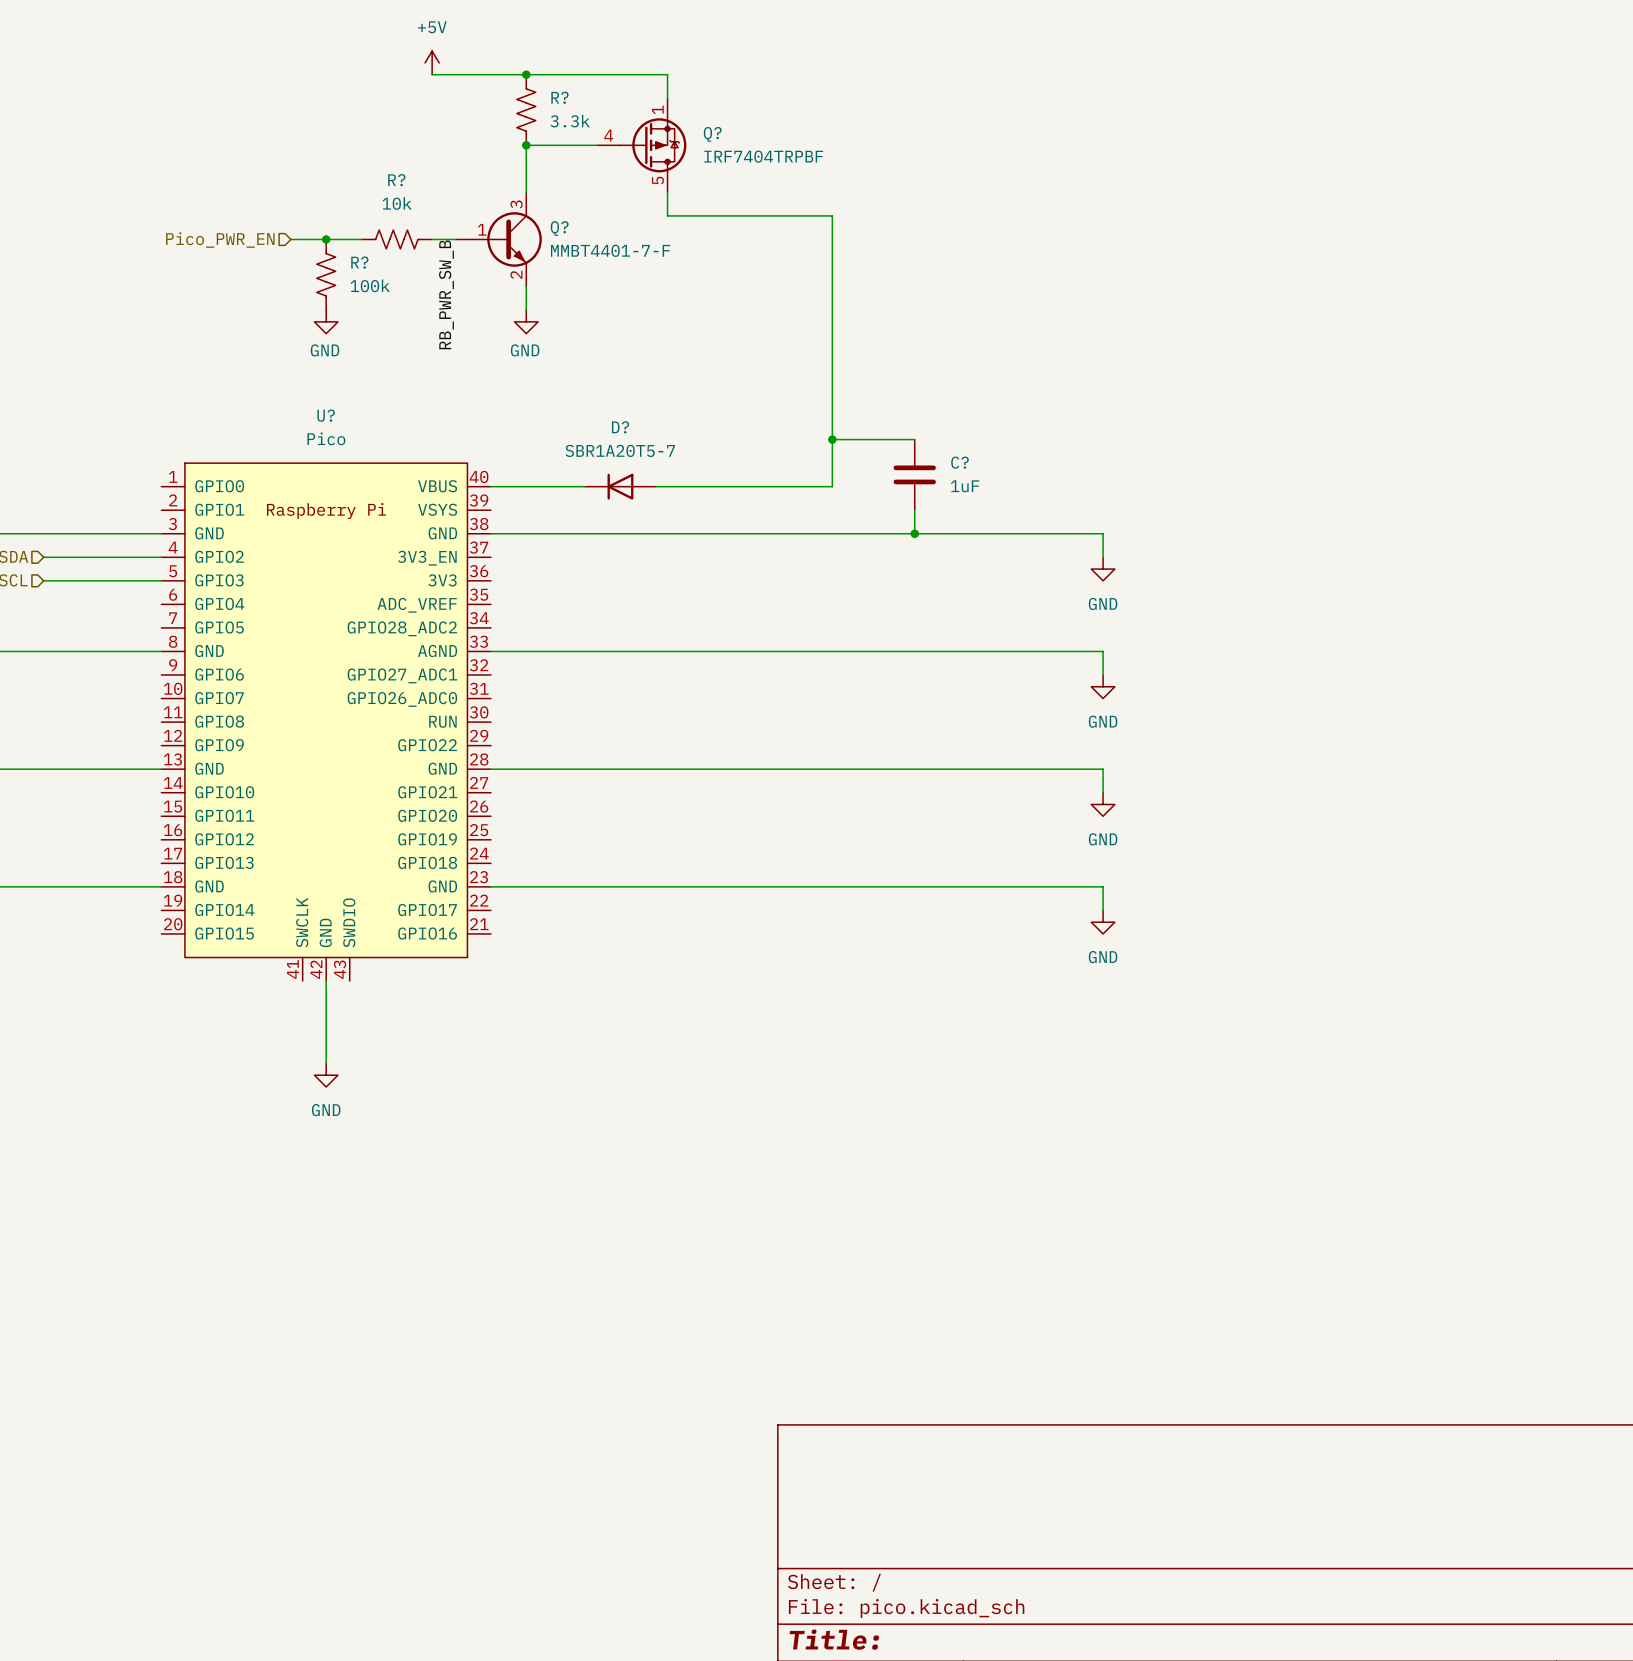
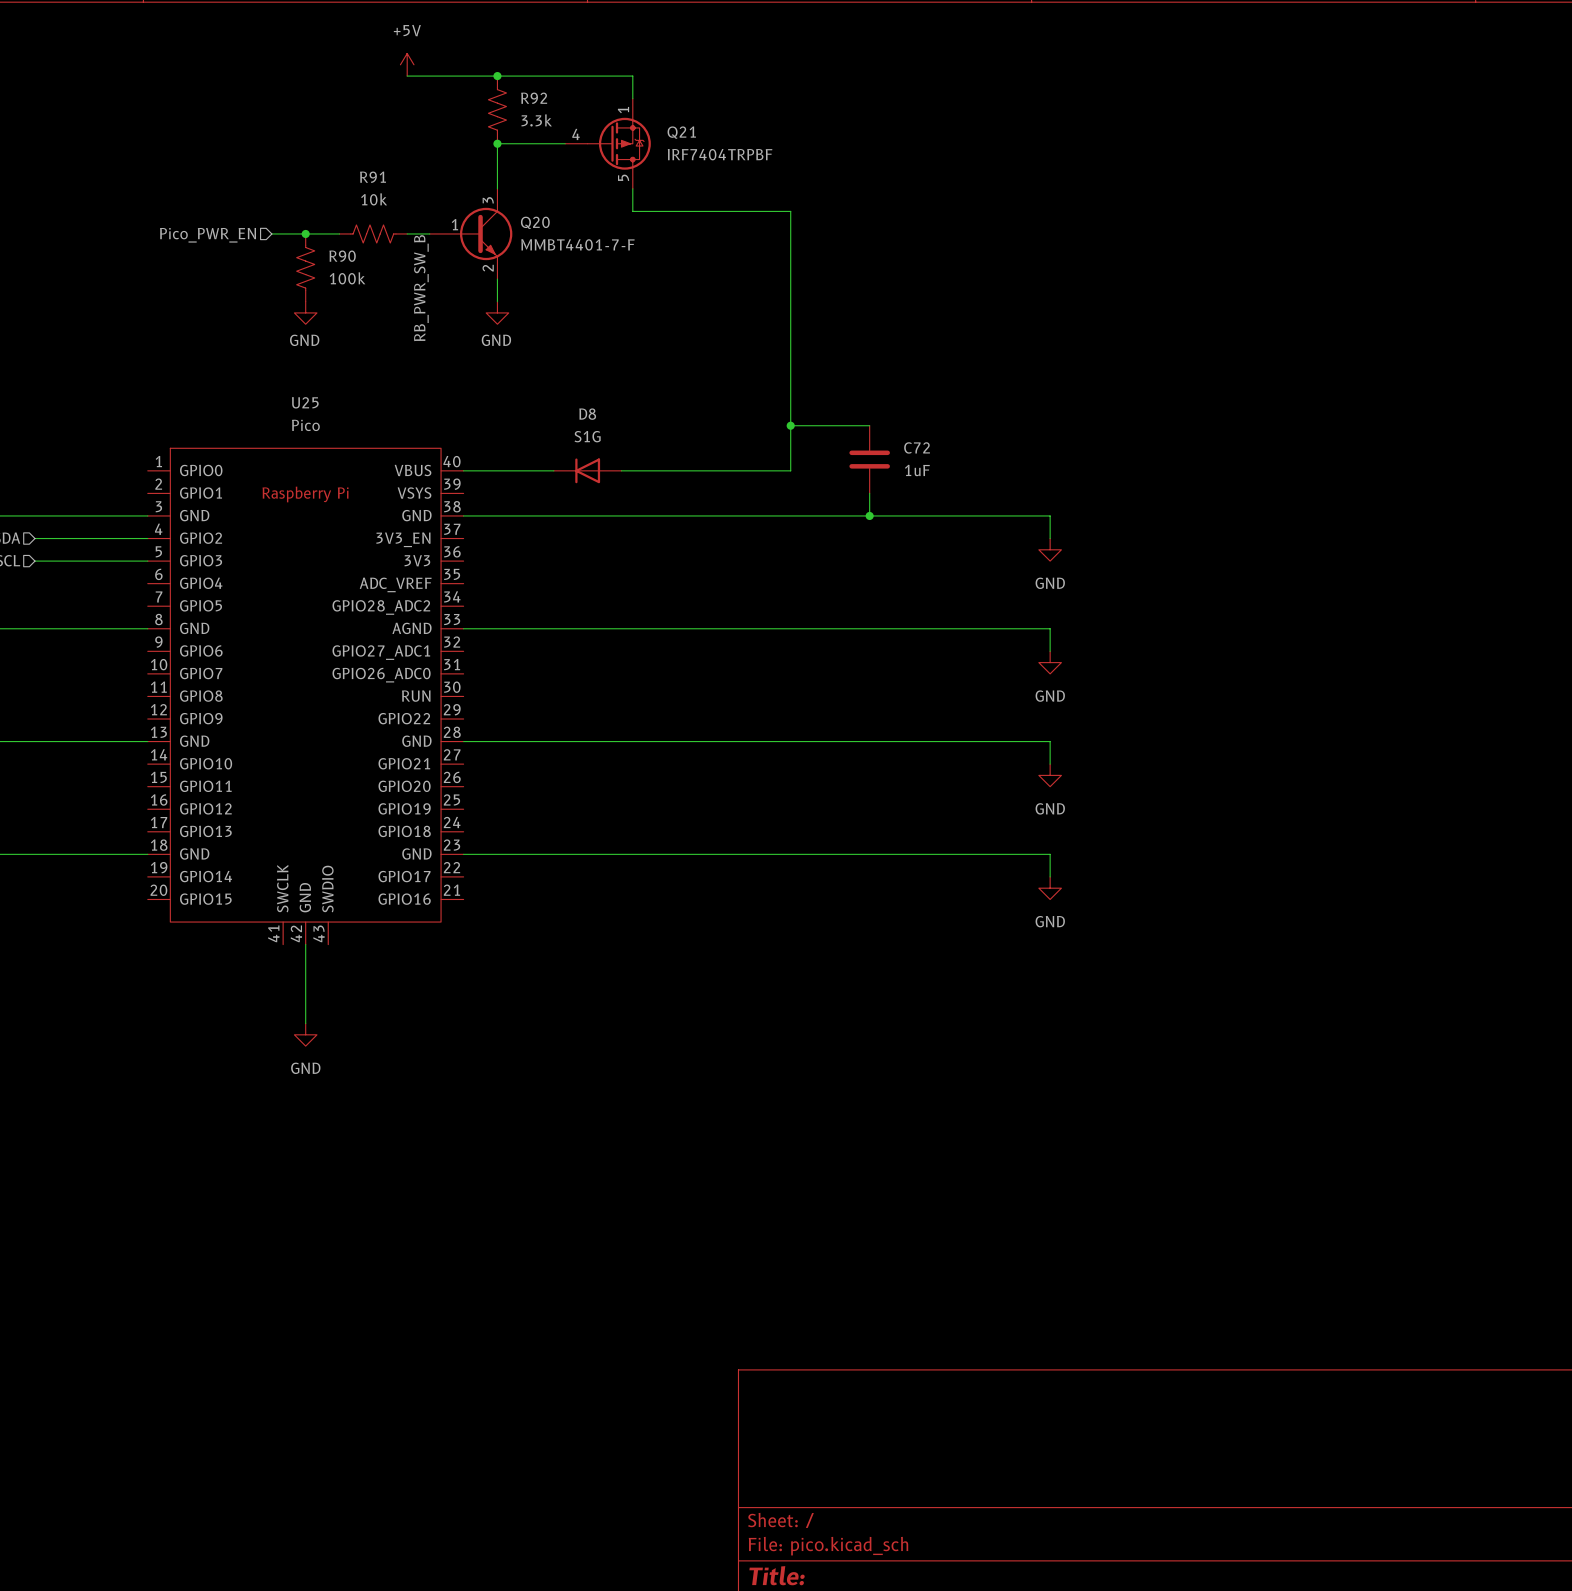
R? name: R? (559, 97) -> R92 (534, 98)
Q? name: Q? (712, 134) -> Q21 (681, 132)
R? name: R? (396, 180) -> R91 (373, 177)
Q? name: Q? (559, 228) -> Q20 (535, 222)
R? name: R? (359, 262) -> R90 (342, 256)
U? name: U? (326, 415) -> U25 (305, 402)
D? name: D? (620, 427) -> D8 (587, 414)
D? value: SBR1A20T5-7 (620, 450) -> S1G (587, 436)
C? name: C? (960, 462) -> C72 (917, 447)

